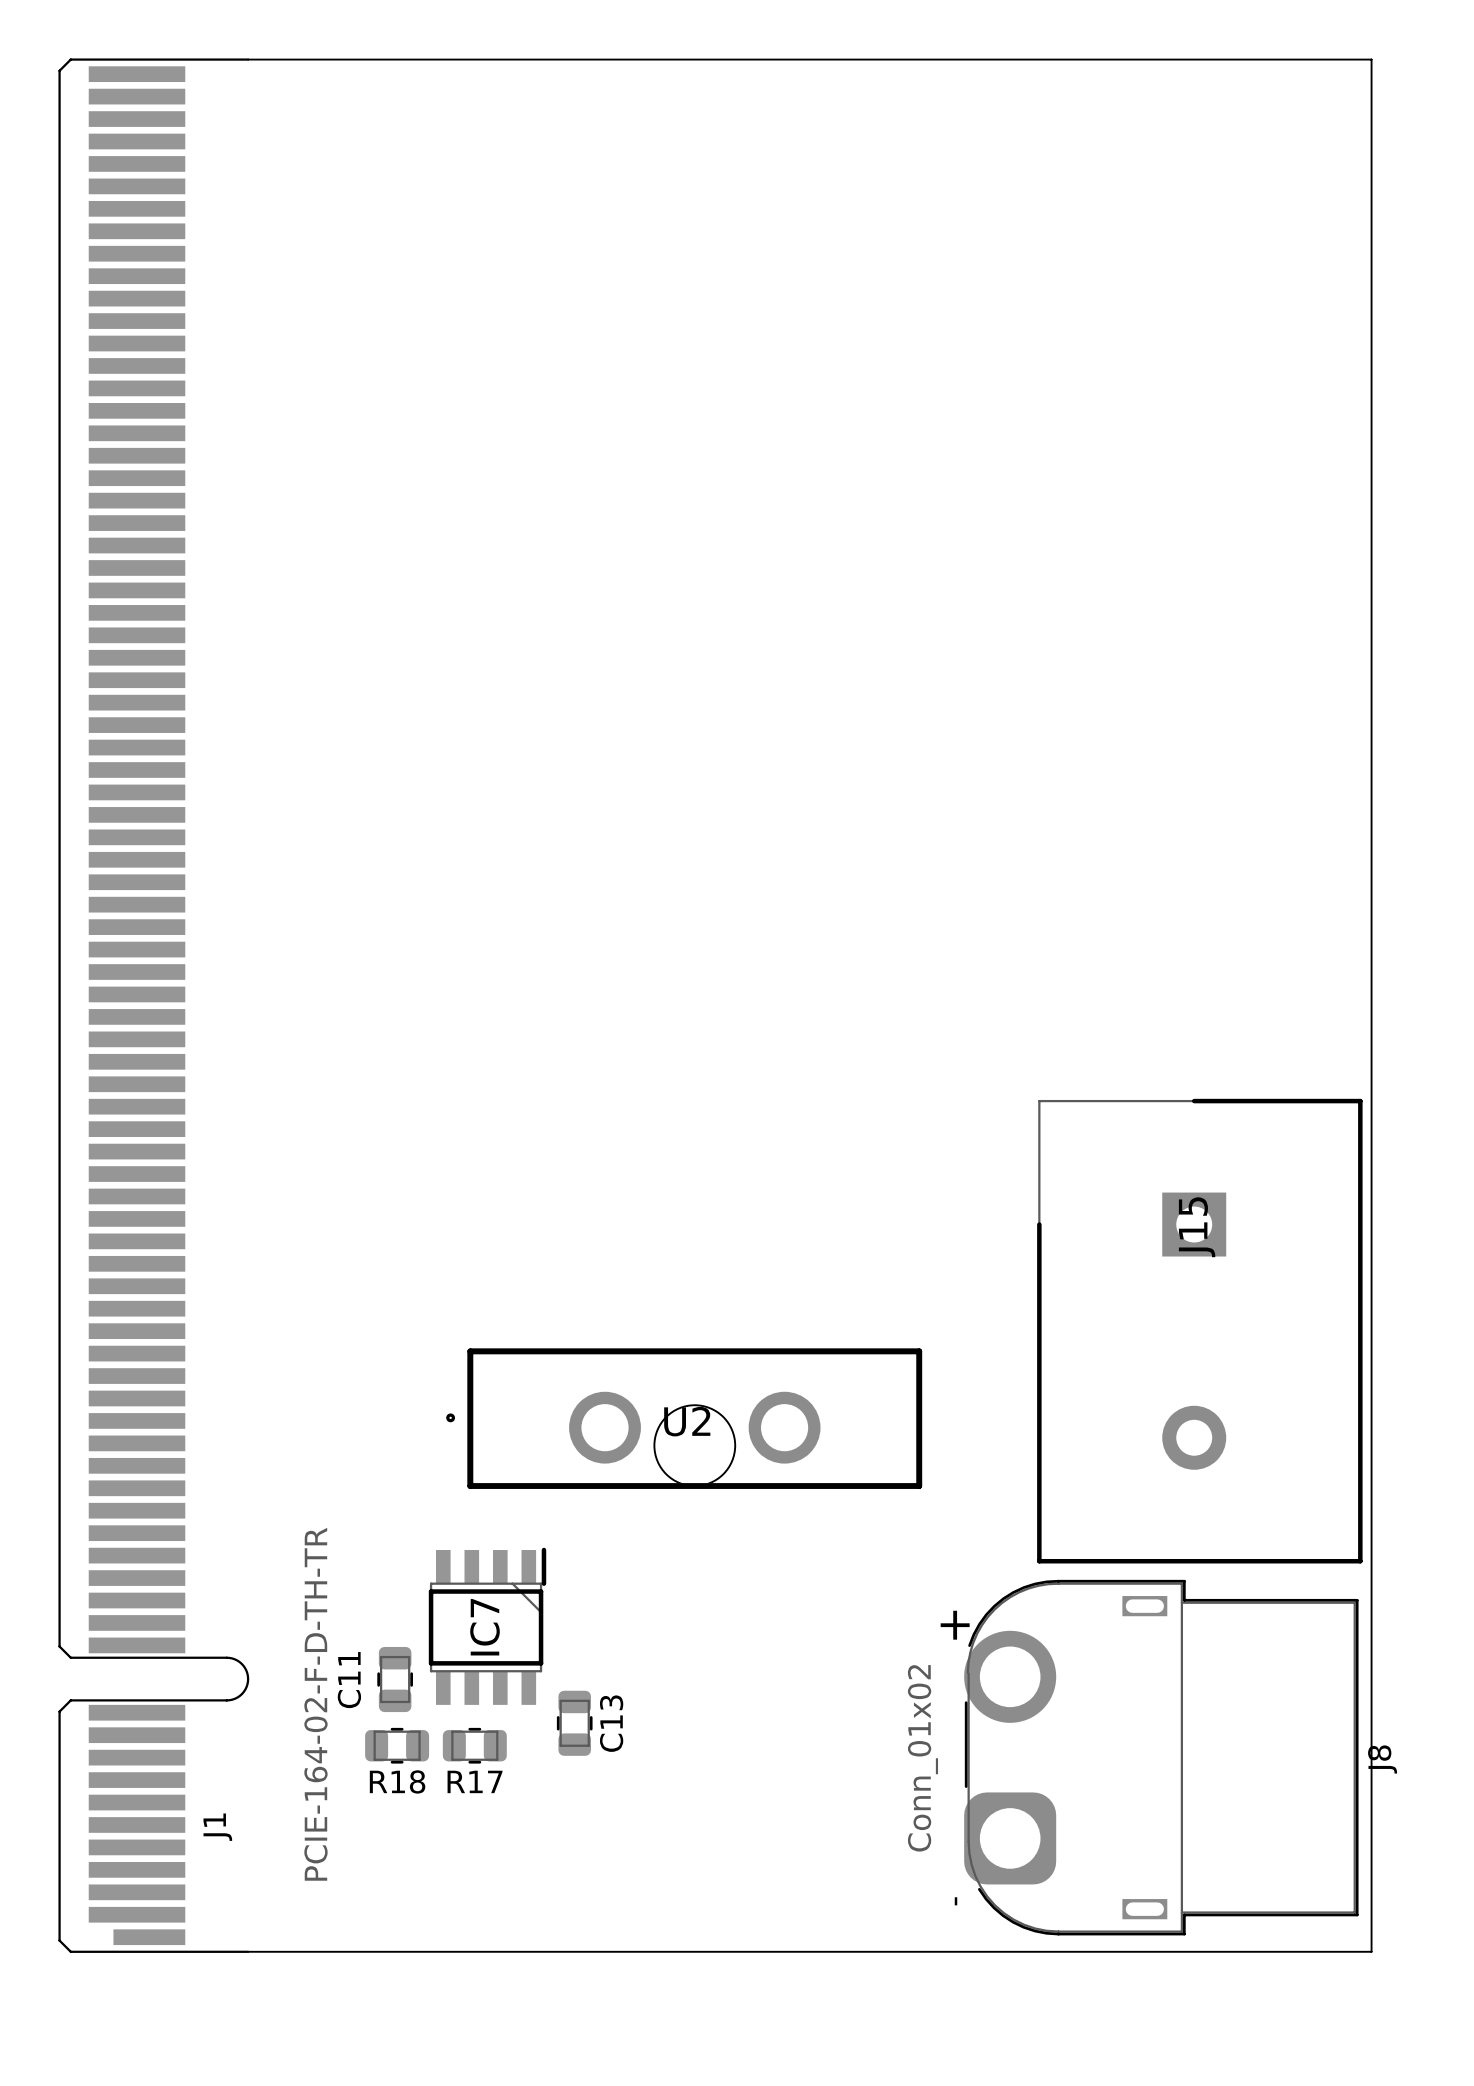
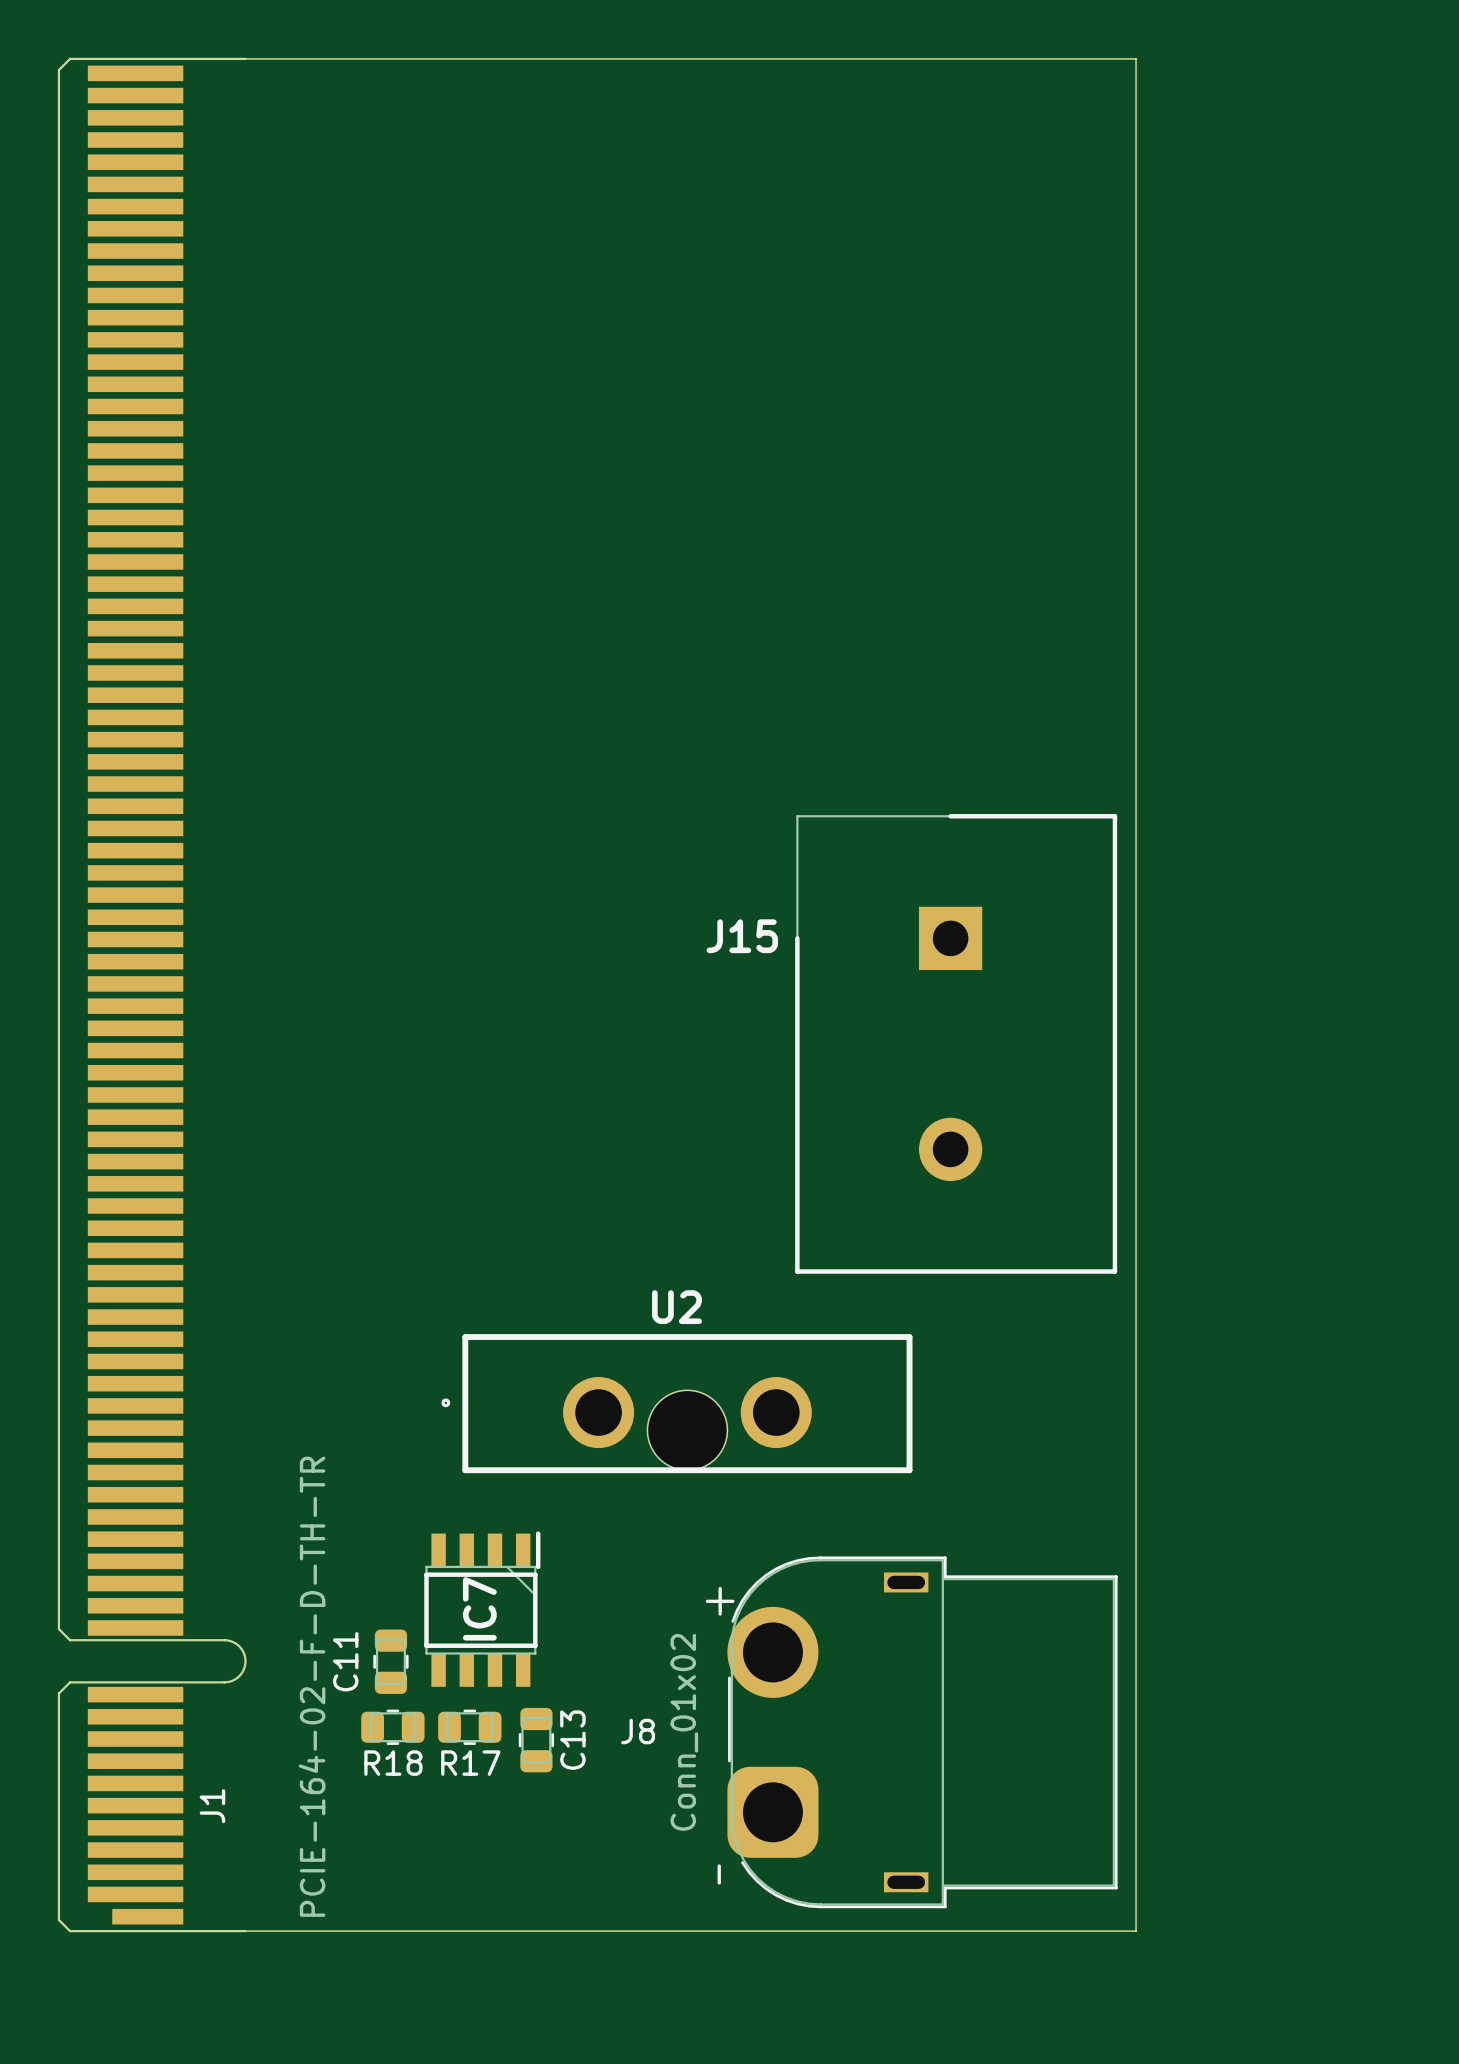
board edge: (1148, 59) (1371, 59) (1371, 1951) (1148, 1951) -> (1136, 58) (1136, 1931)
J15 name rotation: 0° (1197, 1227) -> 90° clockwise (742, 936)
J15 name position: J15 (1197, 1227) -> J15 (742, 936)
J15 position: (1199, 1331) -> (956, 1043)
U2 name position: U2 (687, 1421) -> U2 (677, 1307)
C13 position: (574, 1723) -> (536, 1740)
J8 position: (1161, 1757) -> (922, 1732)
J8 name rotation: 0° (1382, 1759) -> 90° clockwise (638, 1731)
J8 name position: J8 (1382, 1759) -> J8 (638, 1731)

